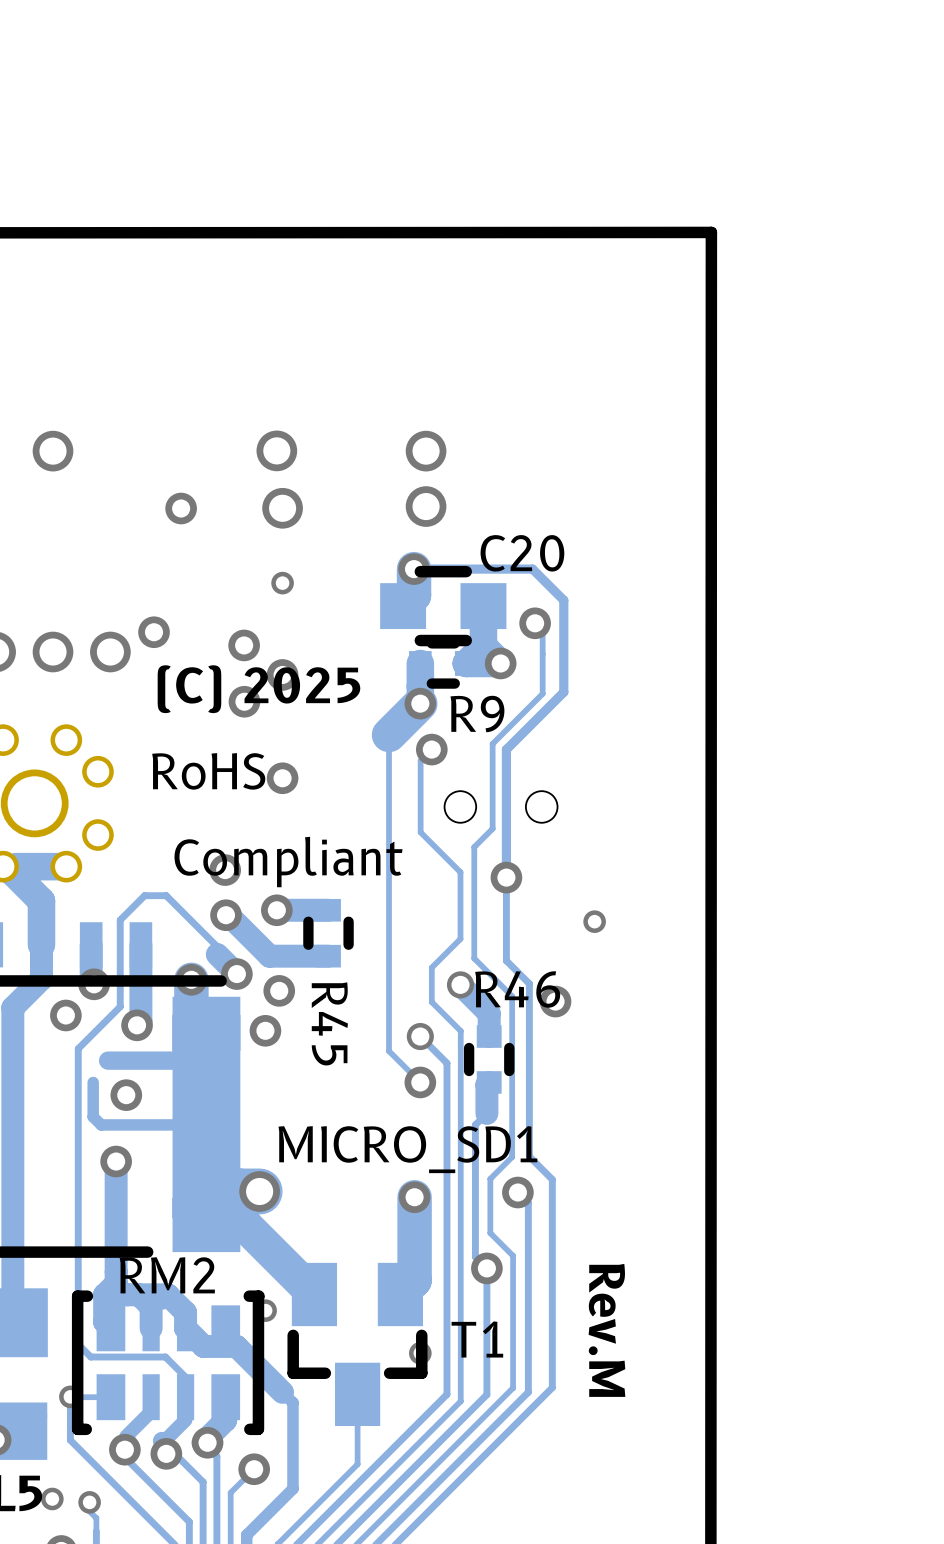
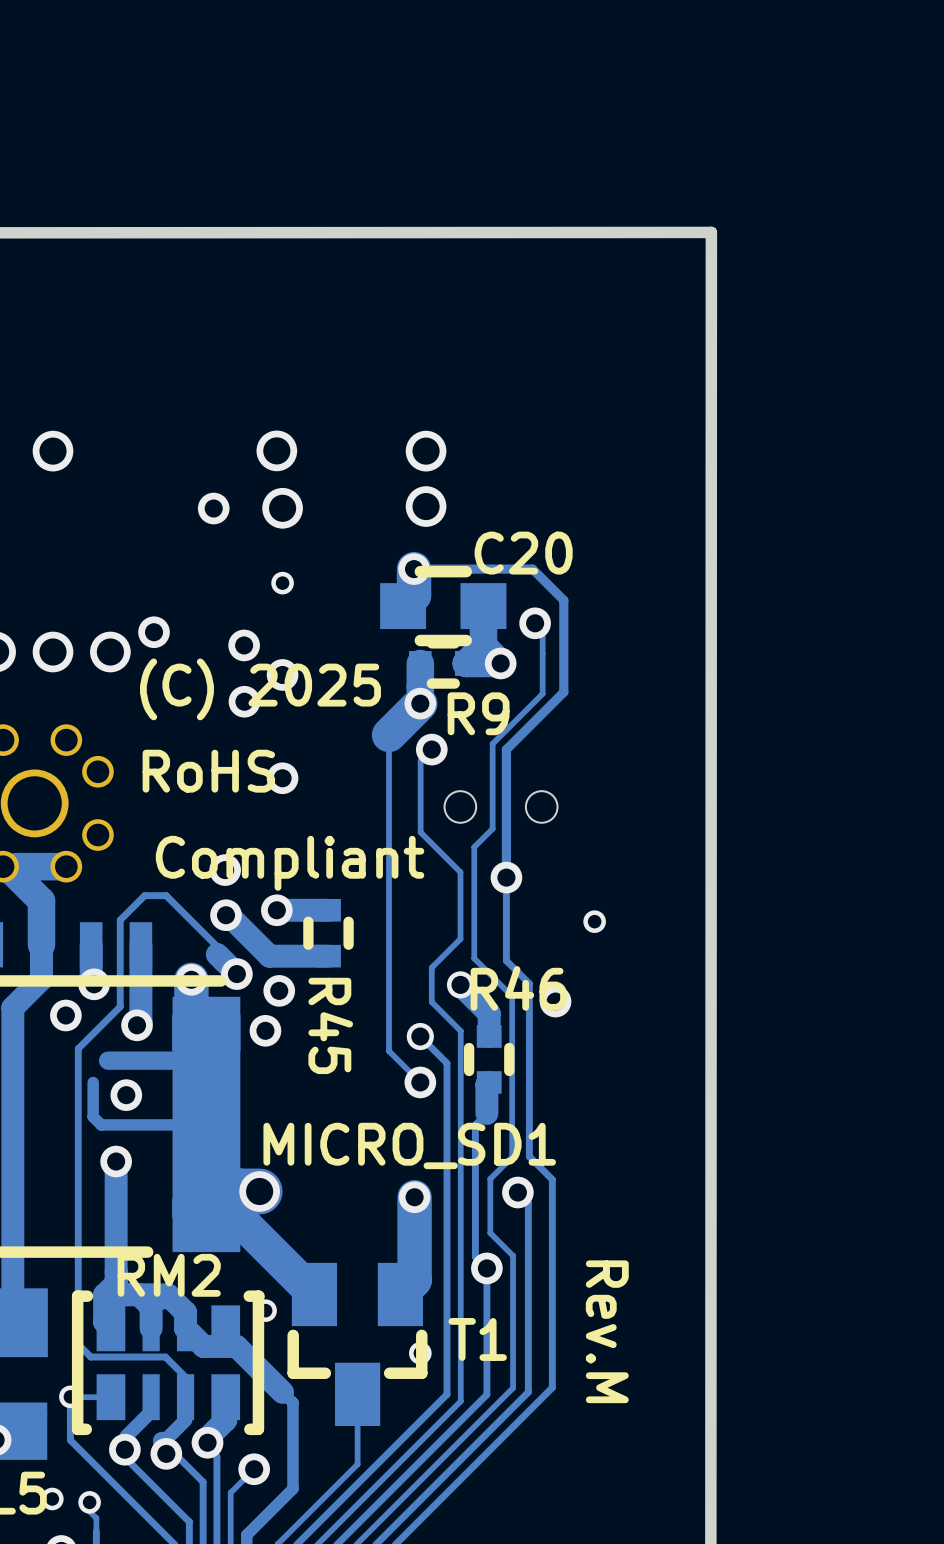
via position: (181, 508) -> (213, 508)

